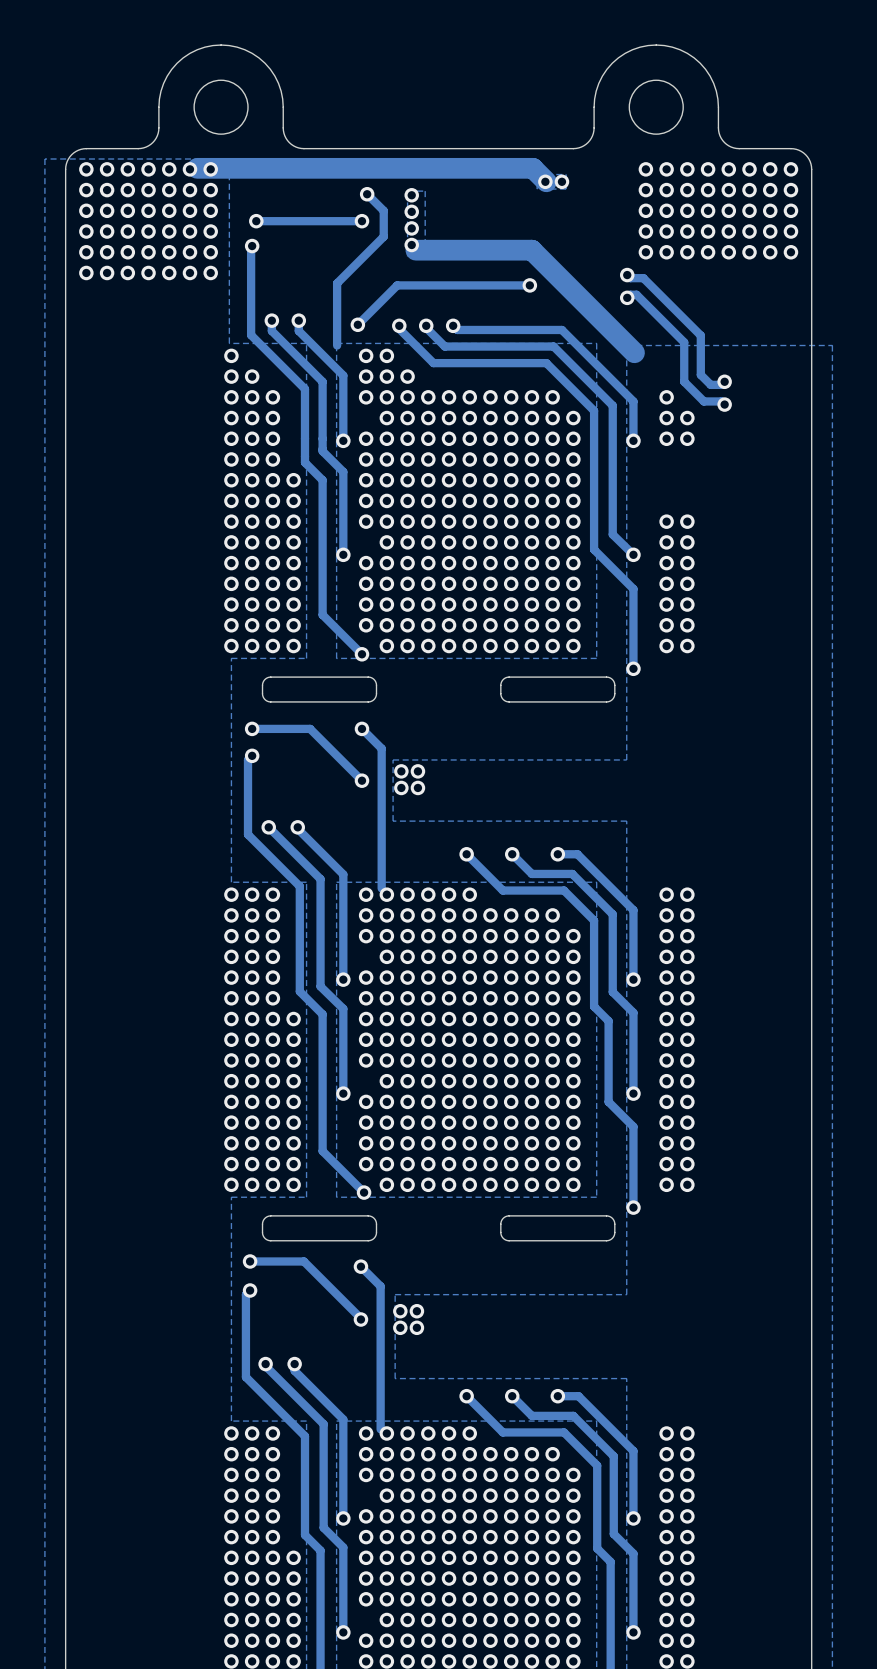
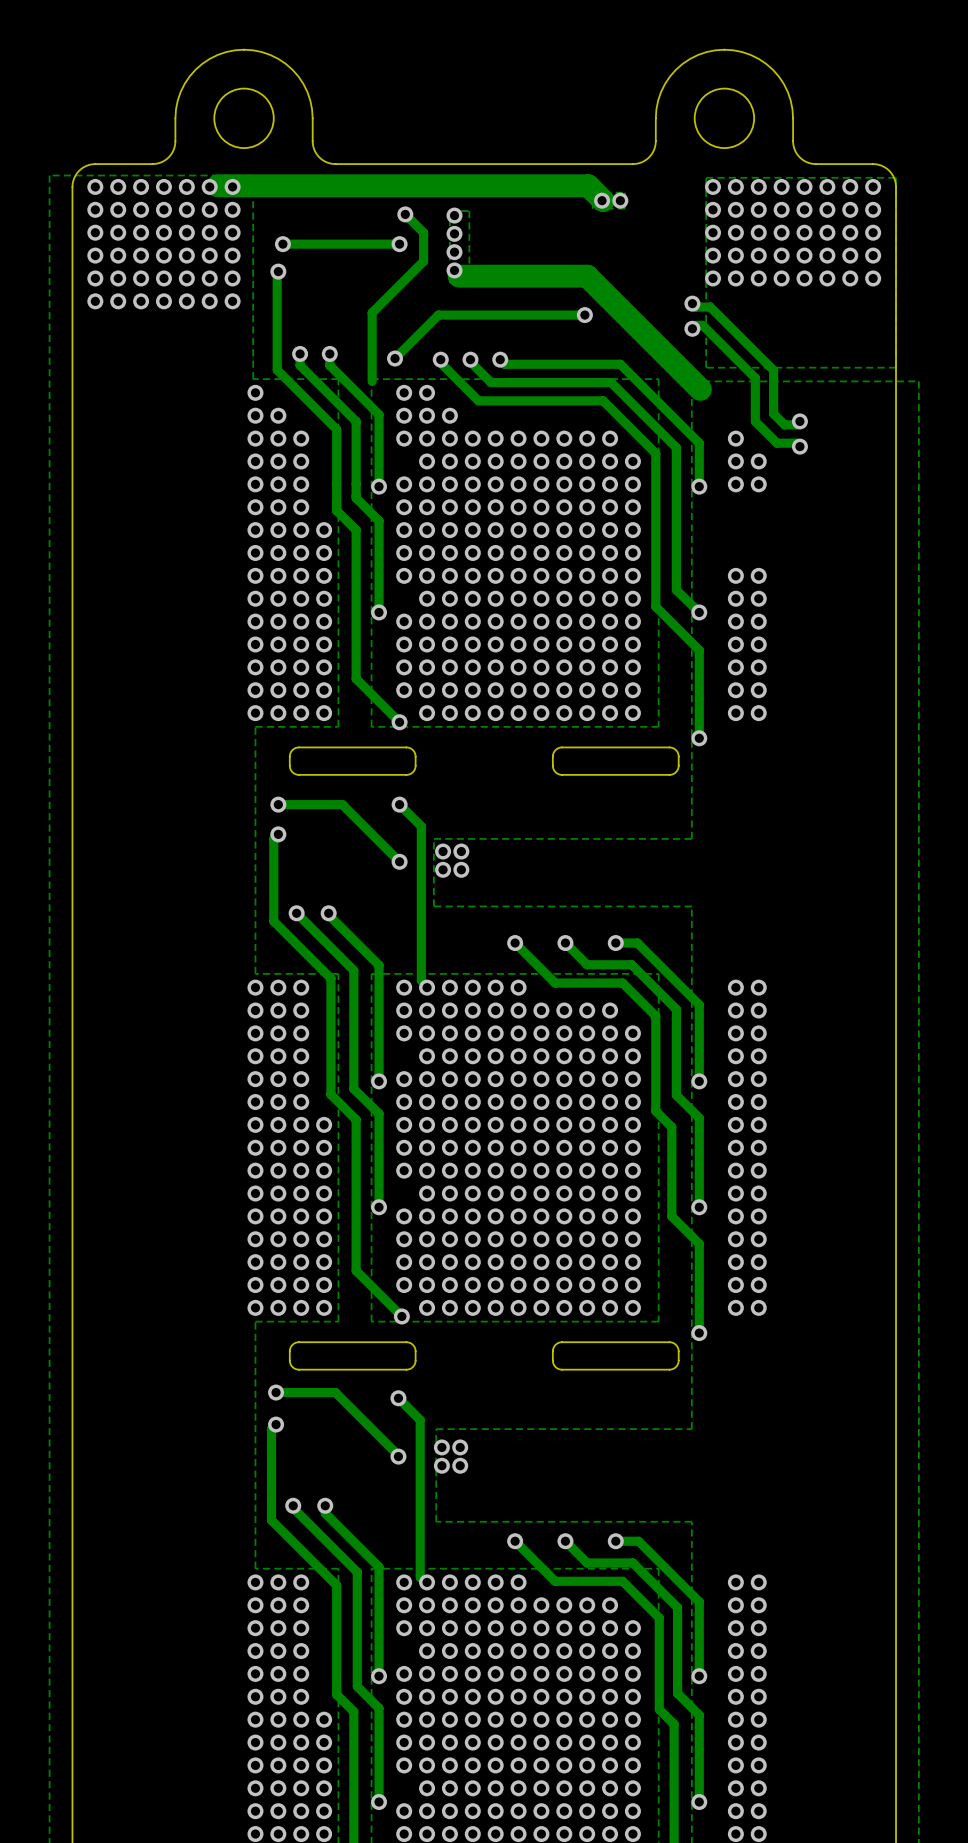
zone outline: none -> (896, 177) (706, 177) (706, 367) (896, 367) (896, 177)

